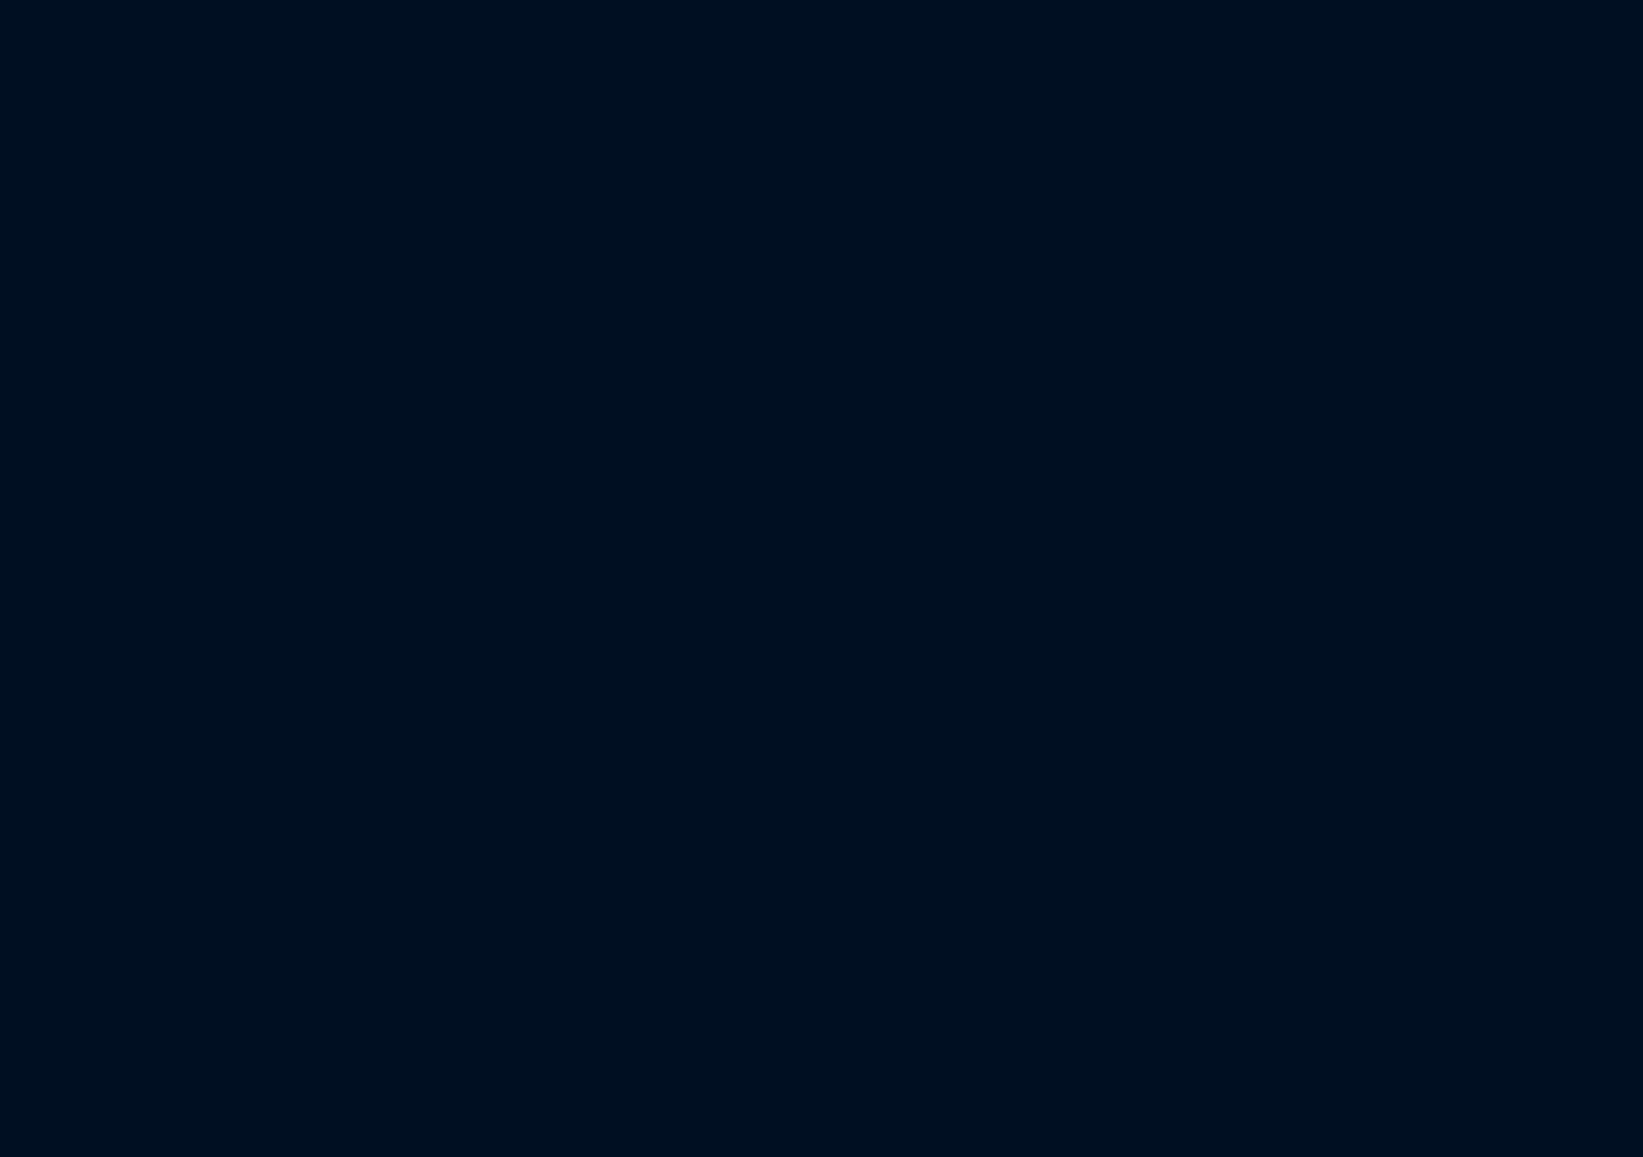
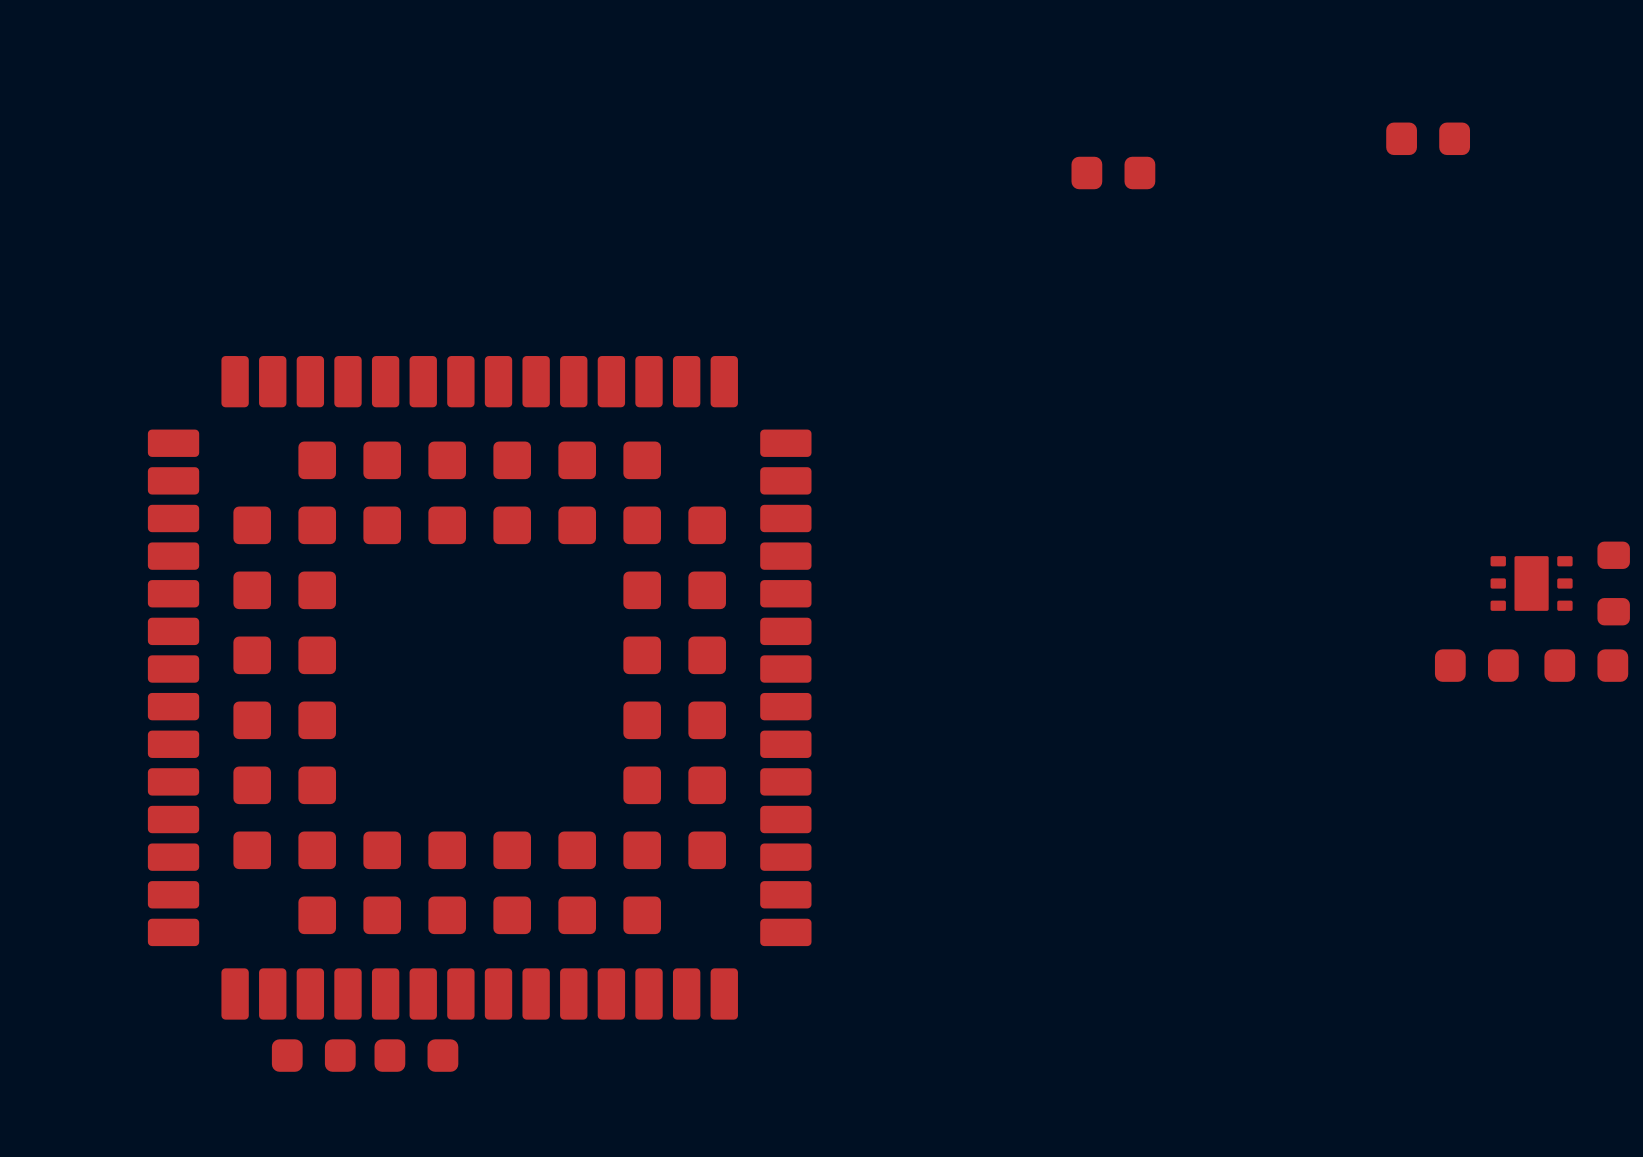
part: none -> (1428, 138)
part: none -> (1113, 173)
part: none -> (1531, 583)
part: none -> (1613, 583)
part: none -> (1476, 665)
part: none -> (1586, 665)
part: none -> (479, 687)
part: none -> (313, 1055)
part: none -> (416, 1055)

